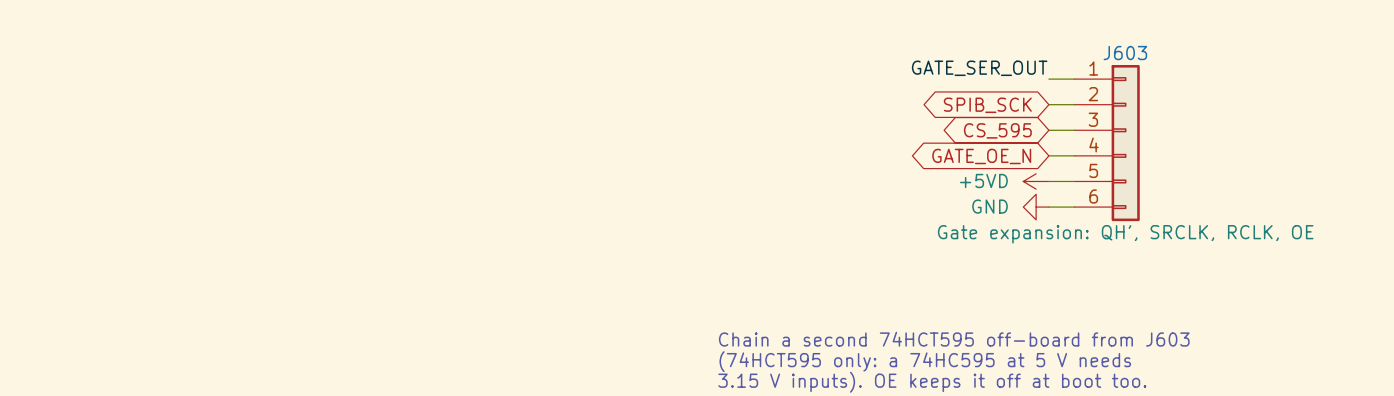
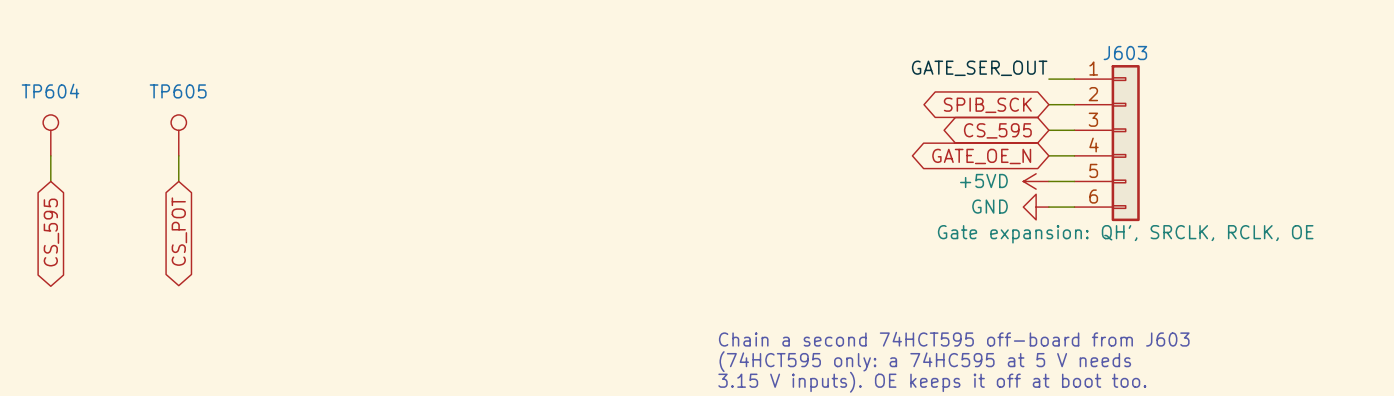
TP604: none -> (50, 135)
TP605: none -> (178, 135)
wire: none -> (50, 155) (50, 181)
wire: none -> (178, 155) (178, 181)
global label: none -> CS_POT (179, 231)
global label: none -> CS_595 (51, 232)

